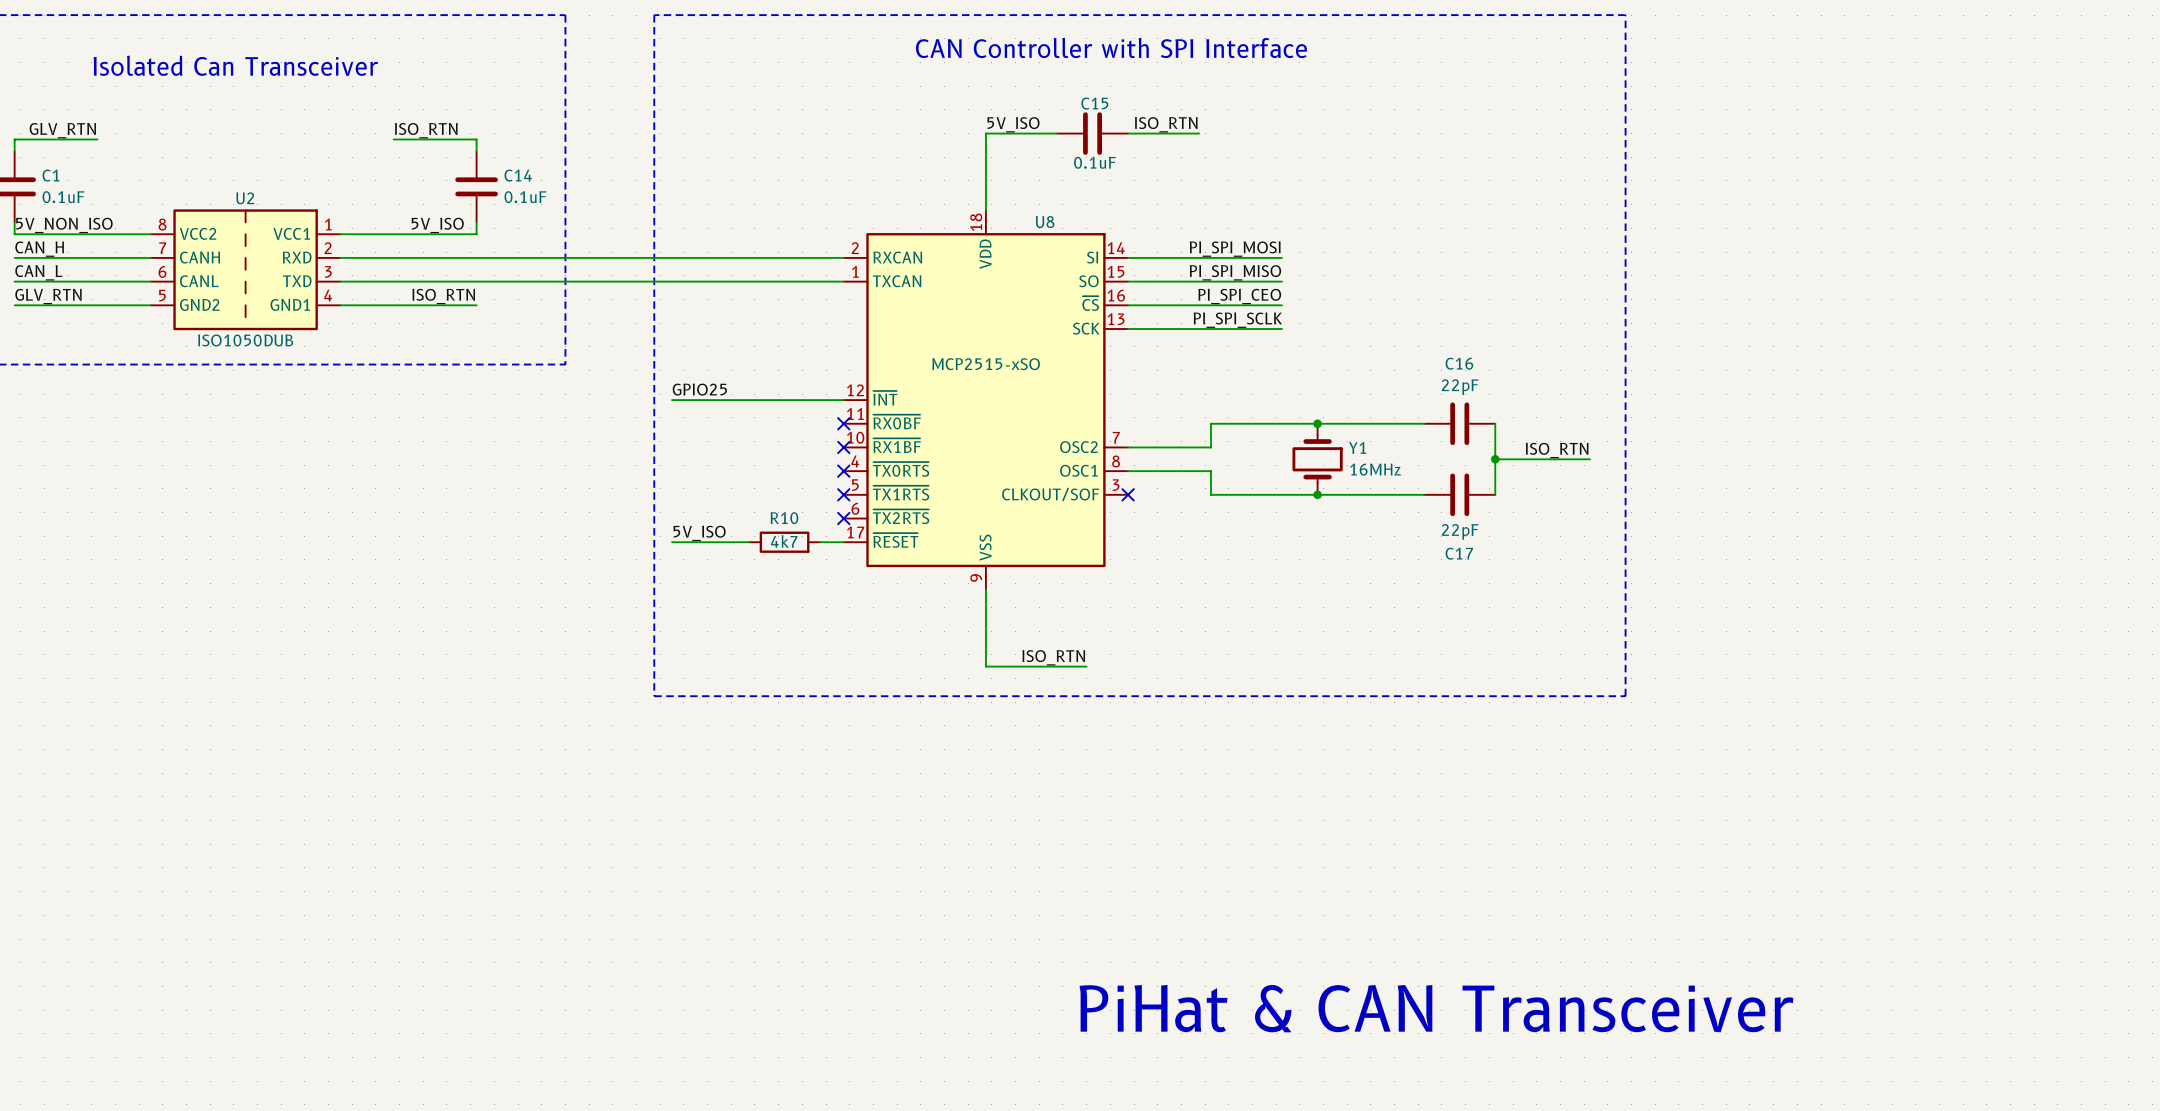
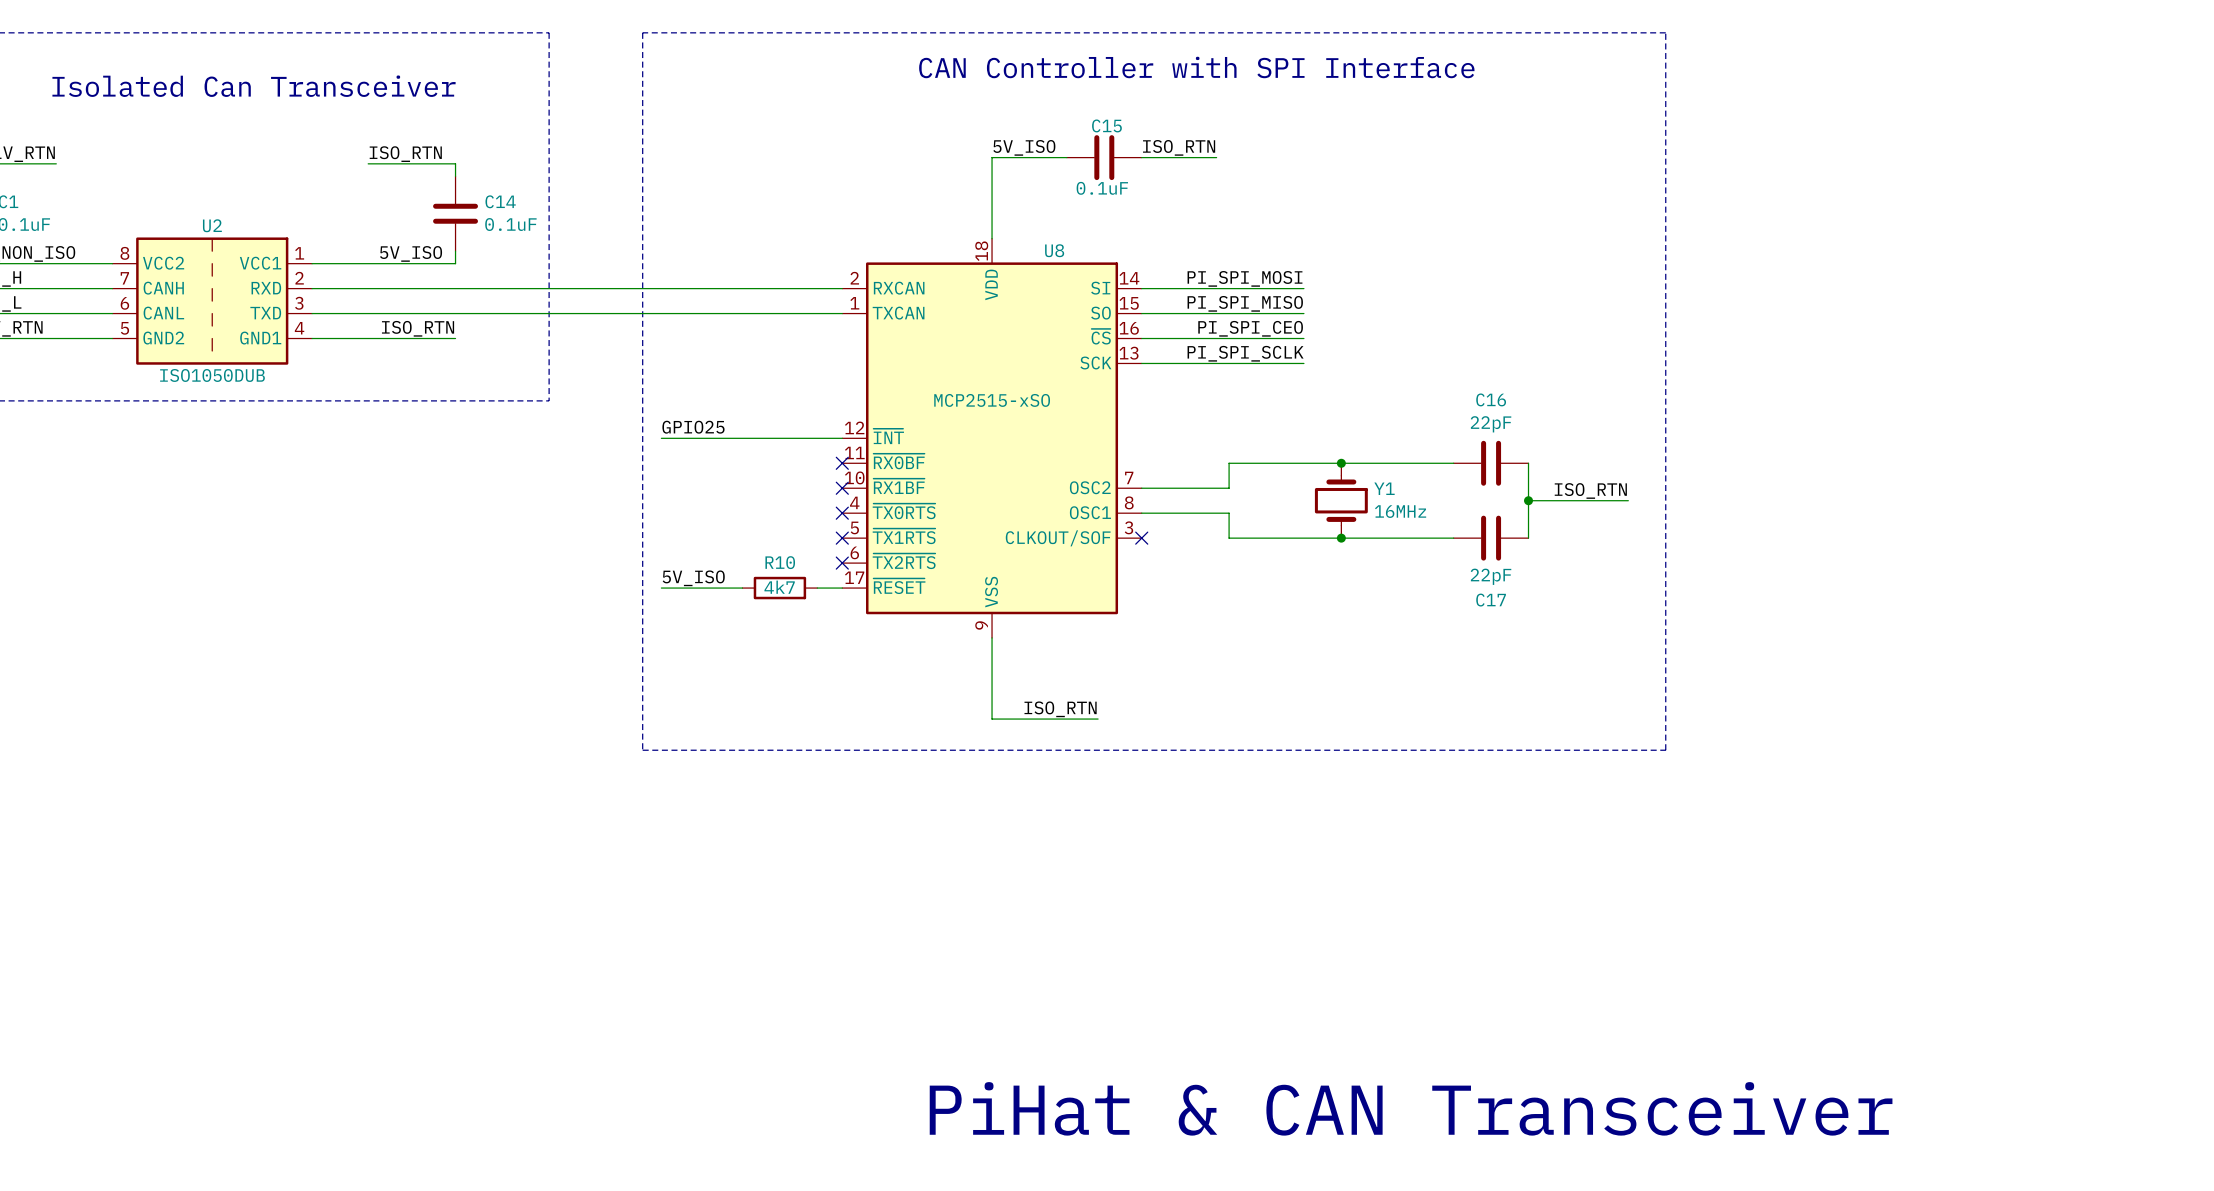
text position: PiHat & CAN Transceiver (1436, 1008) -> PiHat & CAN Transceiver (1411, 1108)

